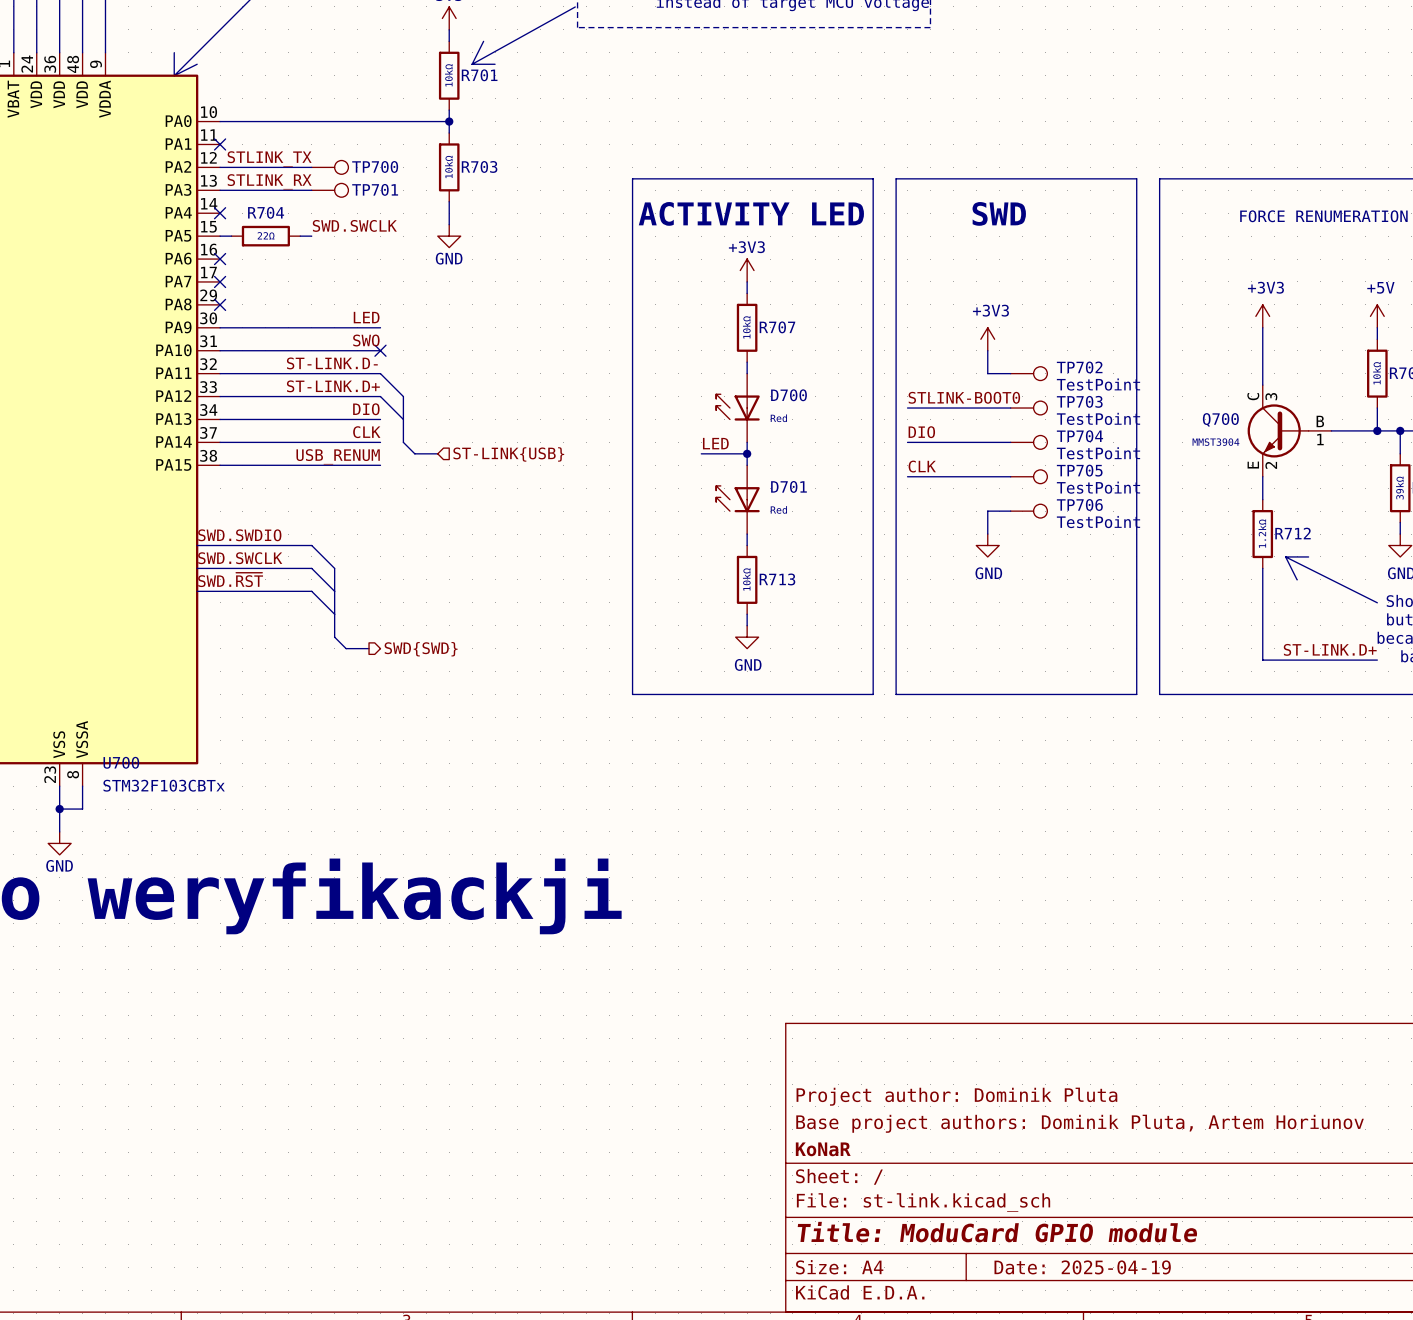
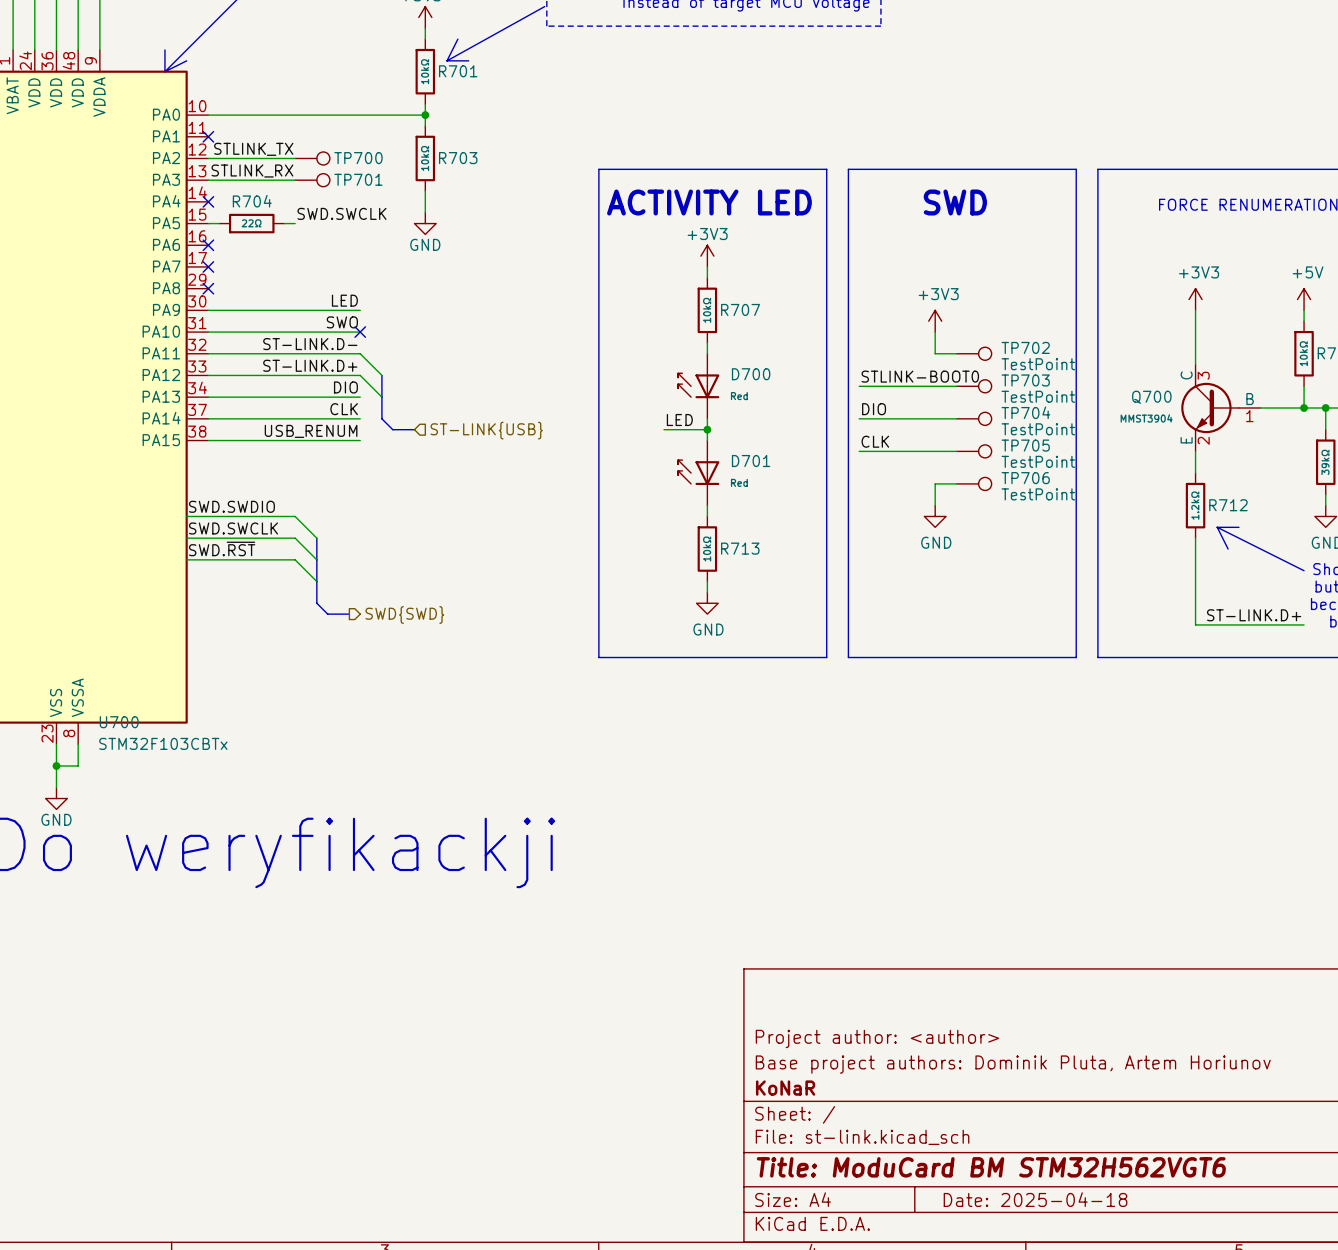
title block: Project author: Dominik Pluta (956, 1096) -> Project author: <author> (877, 1038)
title block: Title: ModuCard GPIO module (997, 1232) -> Title: ModuCard BM STM32H562VGT6 (991, 1167)
title block: Date: 2025-04-19 (1082, 1267) -> Date: 2025-04-18 (1035, 1199)

